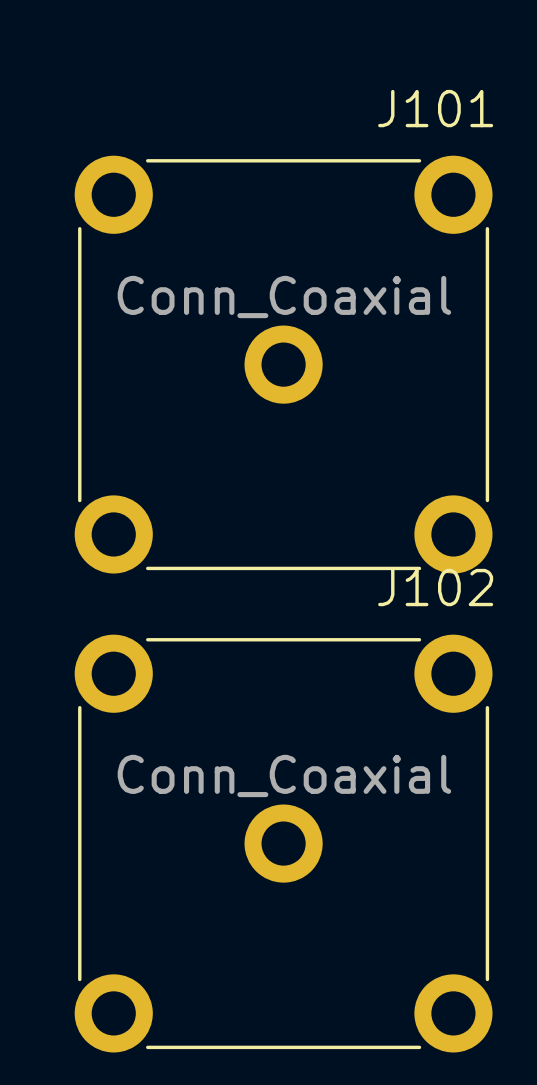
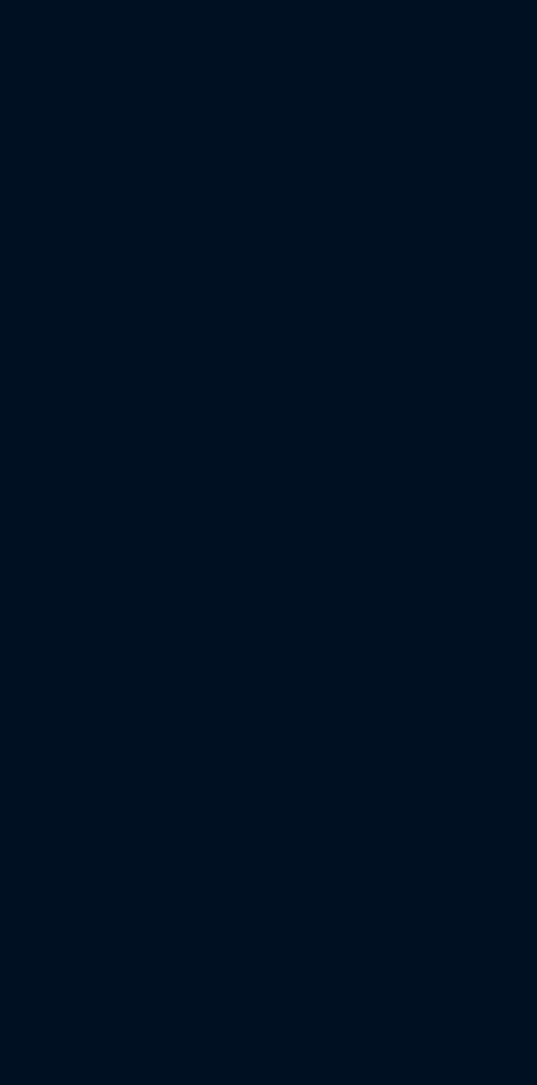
J101: Conn_Coaxial (283, 364) -> none
J102: Conn_Coaxial (283, 843) -> none

